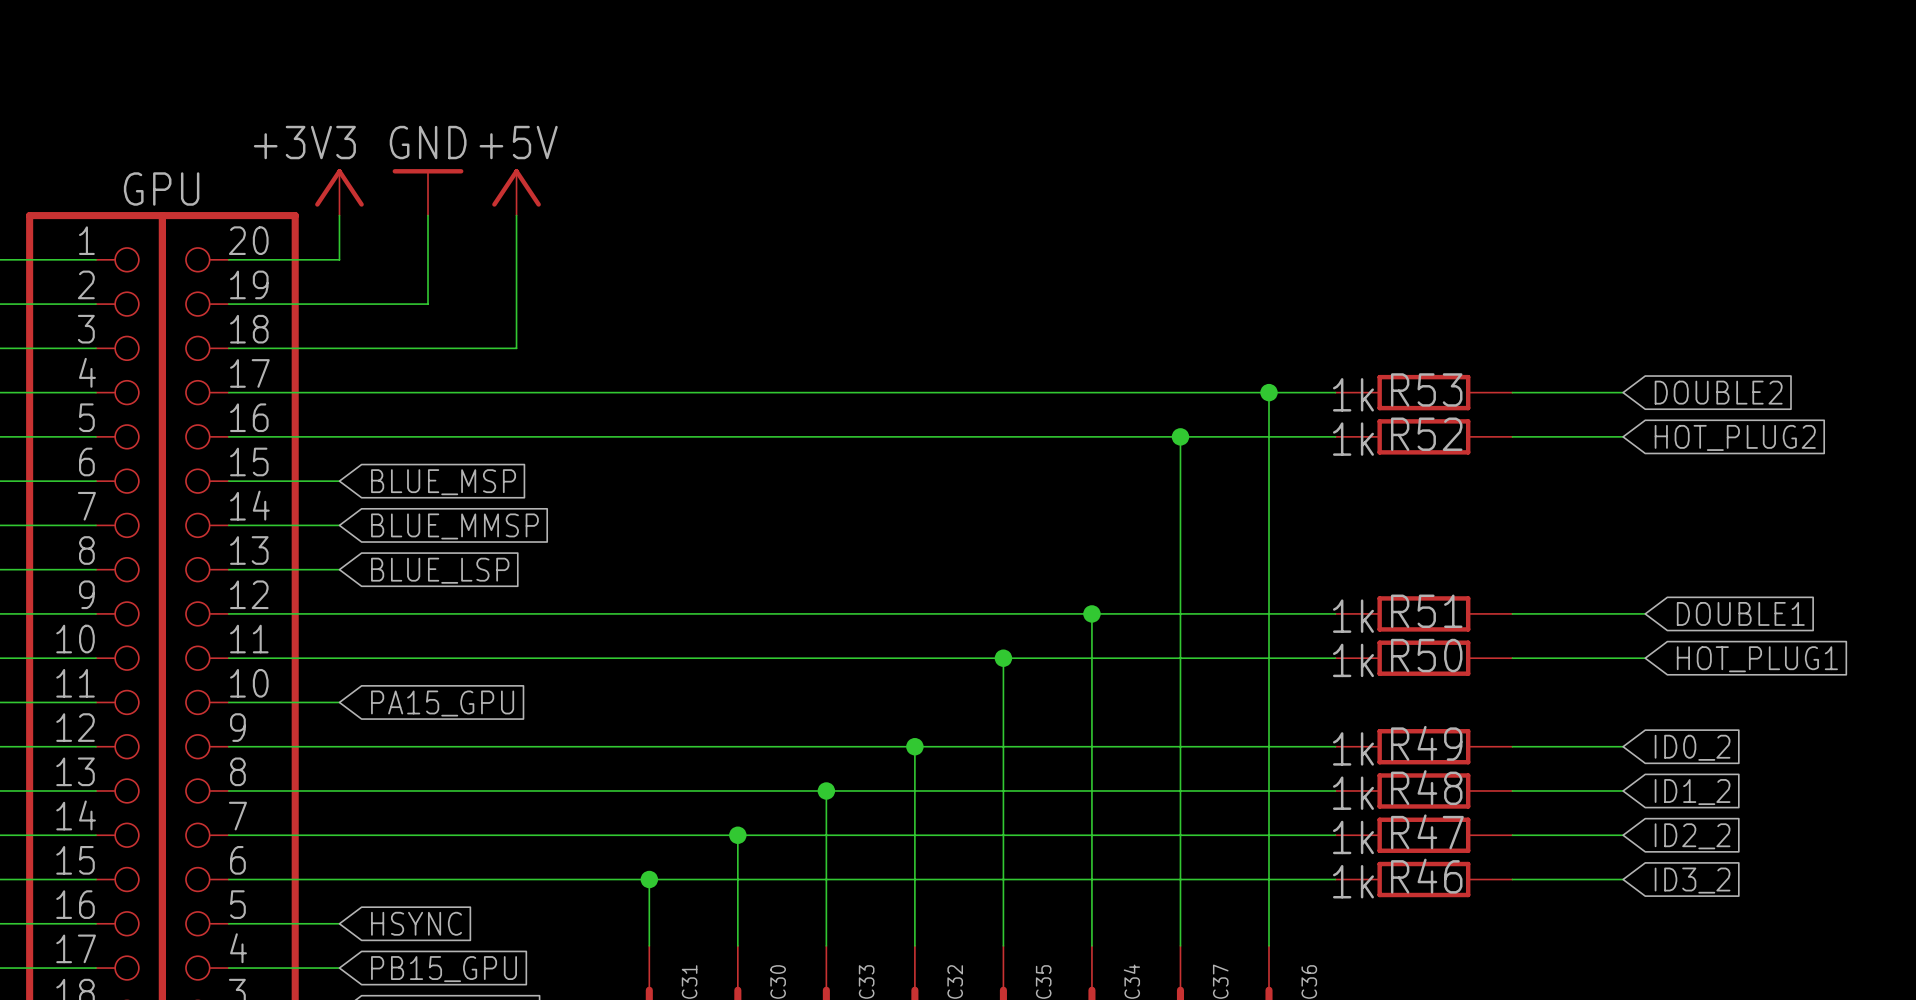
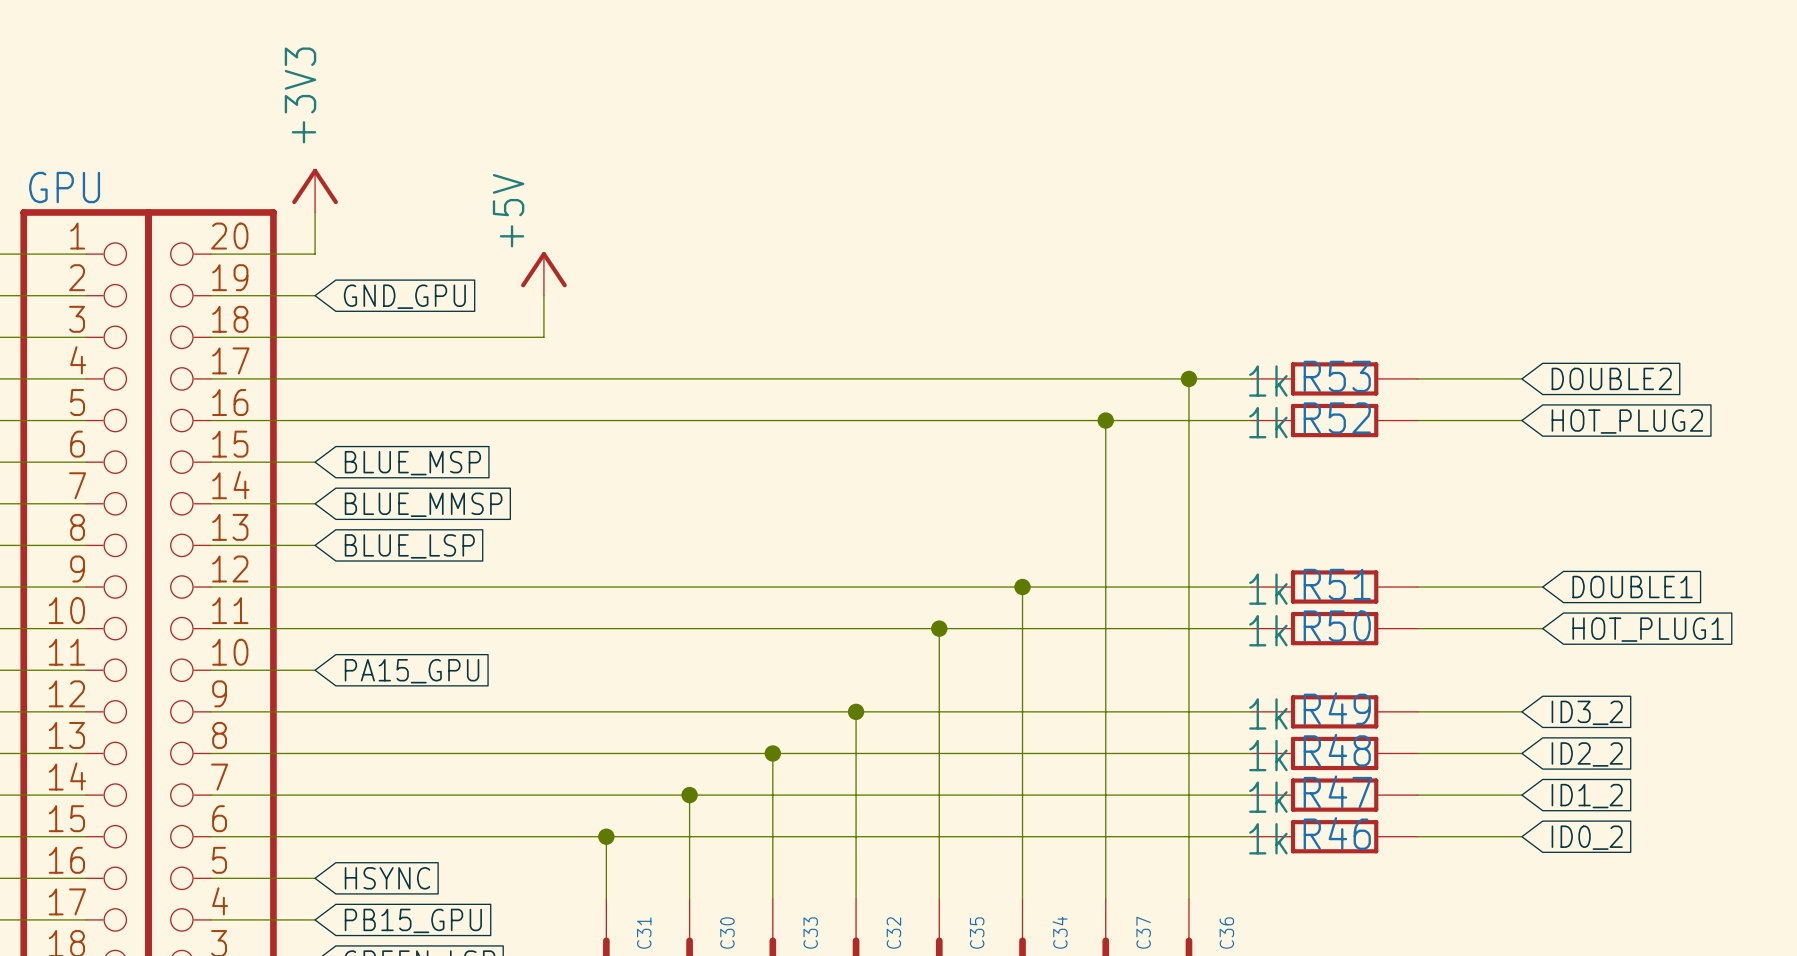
power symbol text rotation: 0° (304, 142) -> 90° counterclockwise (300, 95)
power symbol text rotation: 0° (518, 142) -> 90° counterclockwise (508, 210)
GPU name position: GPU (161, 189) -> GPU (64, 187)
power symbol: GND (428, 192) -> none
power symbol position: +5V (516, 192) -> +5V (543, 273)
wire: (428, 215) (428, 304) (339, 304) -> none
wire: (516, 215) (516, 348) -> (543, 295) (543, 337) (481, 337)
global label: none -> GND_GPU (404, 296)
global label: ID0_2 (1692, 747) -> ID3_2 (1587, 712)
global label: ID1_2 (1692, 792) -> ID2_2 (1587, 754)
global label: ID2_2 (1692, 836) -> ID1_2 (1587, 796)
global label: ID3_2 (1692, 880) -> ID0_2 (1587, 837)

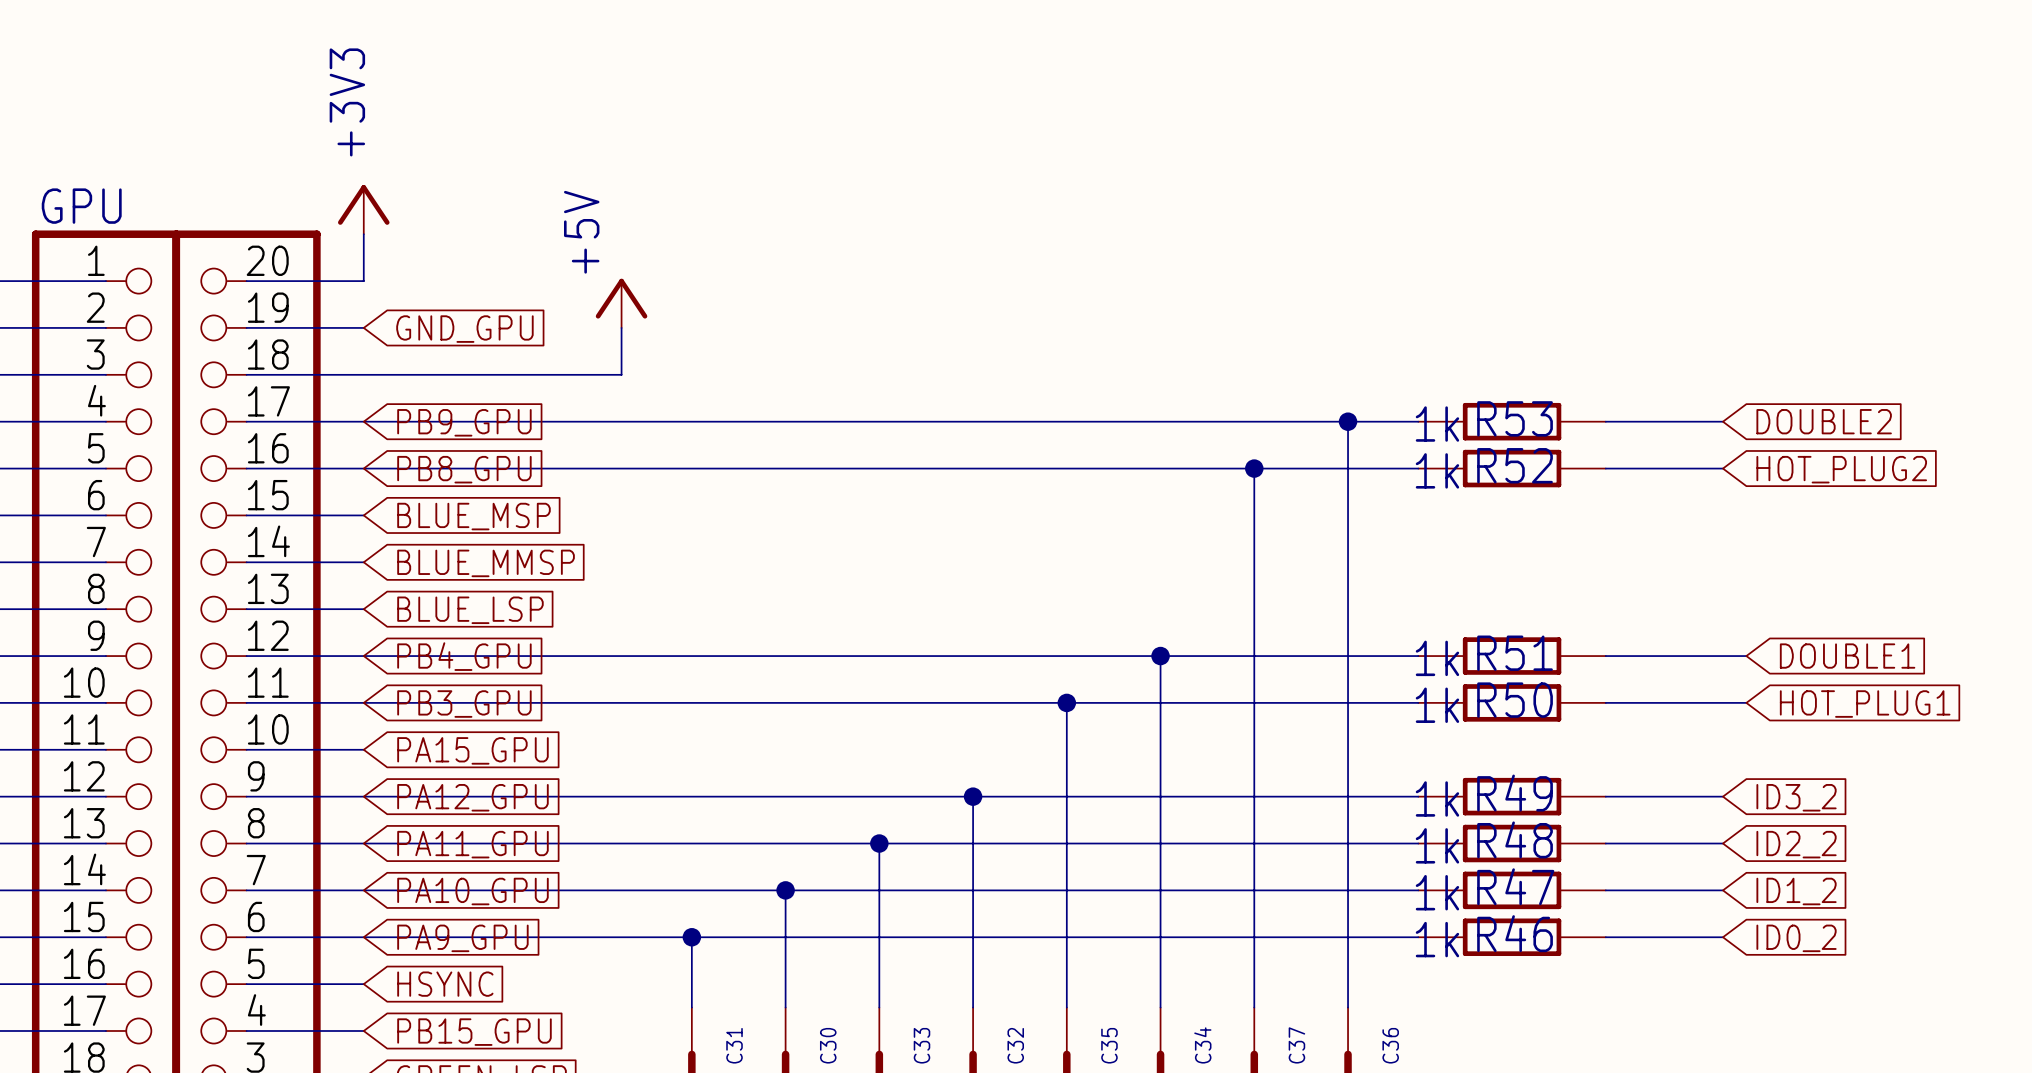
global label: none -> PB9_GPU (464, 422)
global label: none -> PB8_GPU (464, 469)
global label: none -> PB4_GPU (464, 656)
global label: none -> PB3_GPU (464, 704)
global label: none -> PA12_GPU (472, 797)
global label: none -> PA11_GPU (472, 844)
global label: none -> PA10_GPU (472, 891)
global label: none -> PA9_GPU (462, 938)

